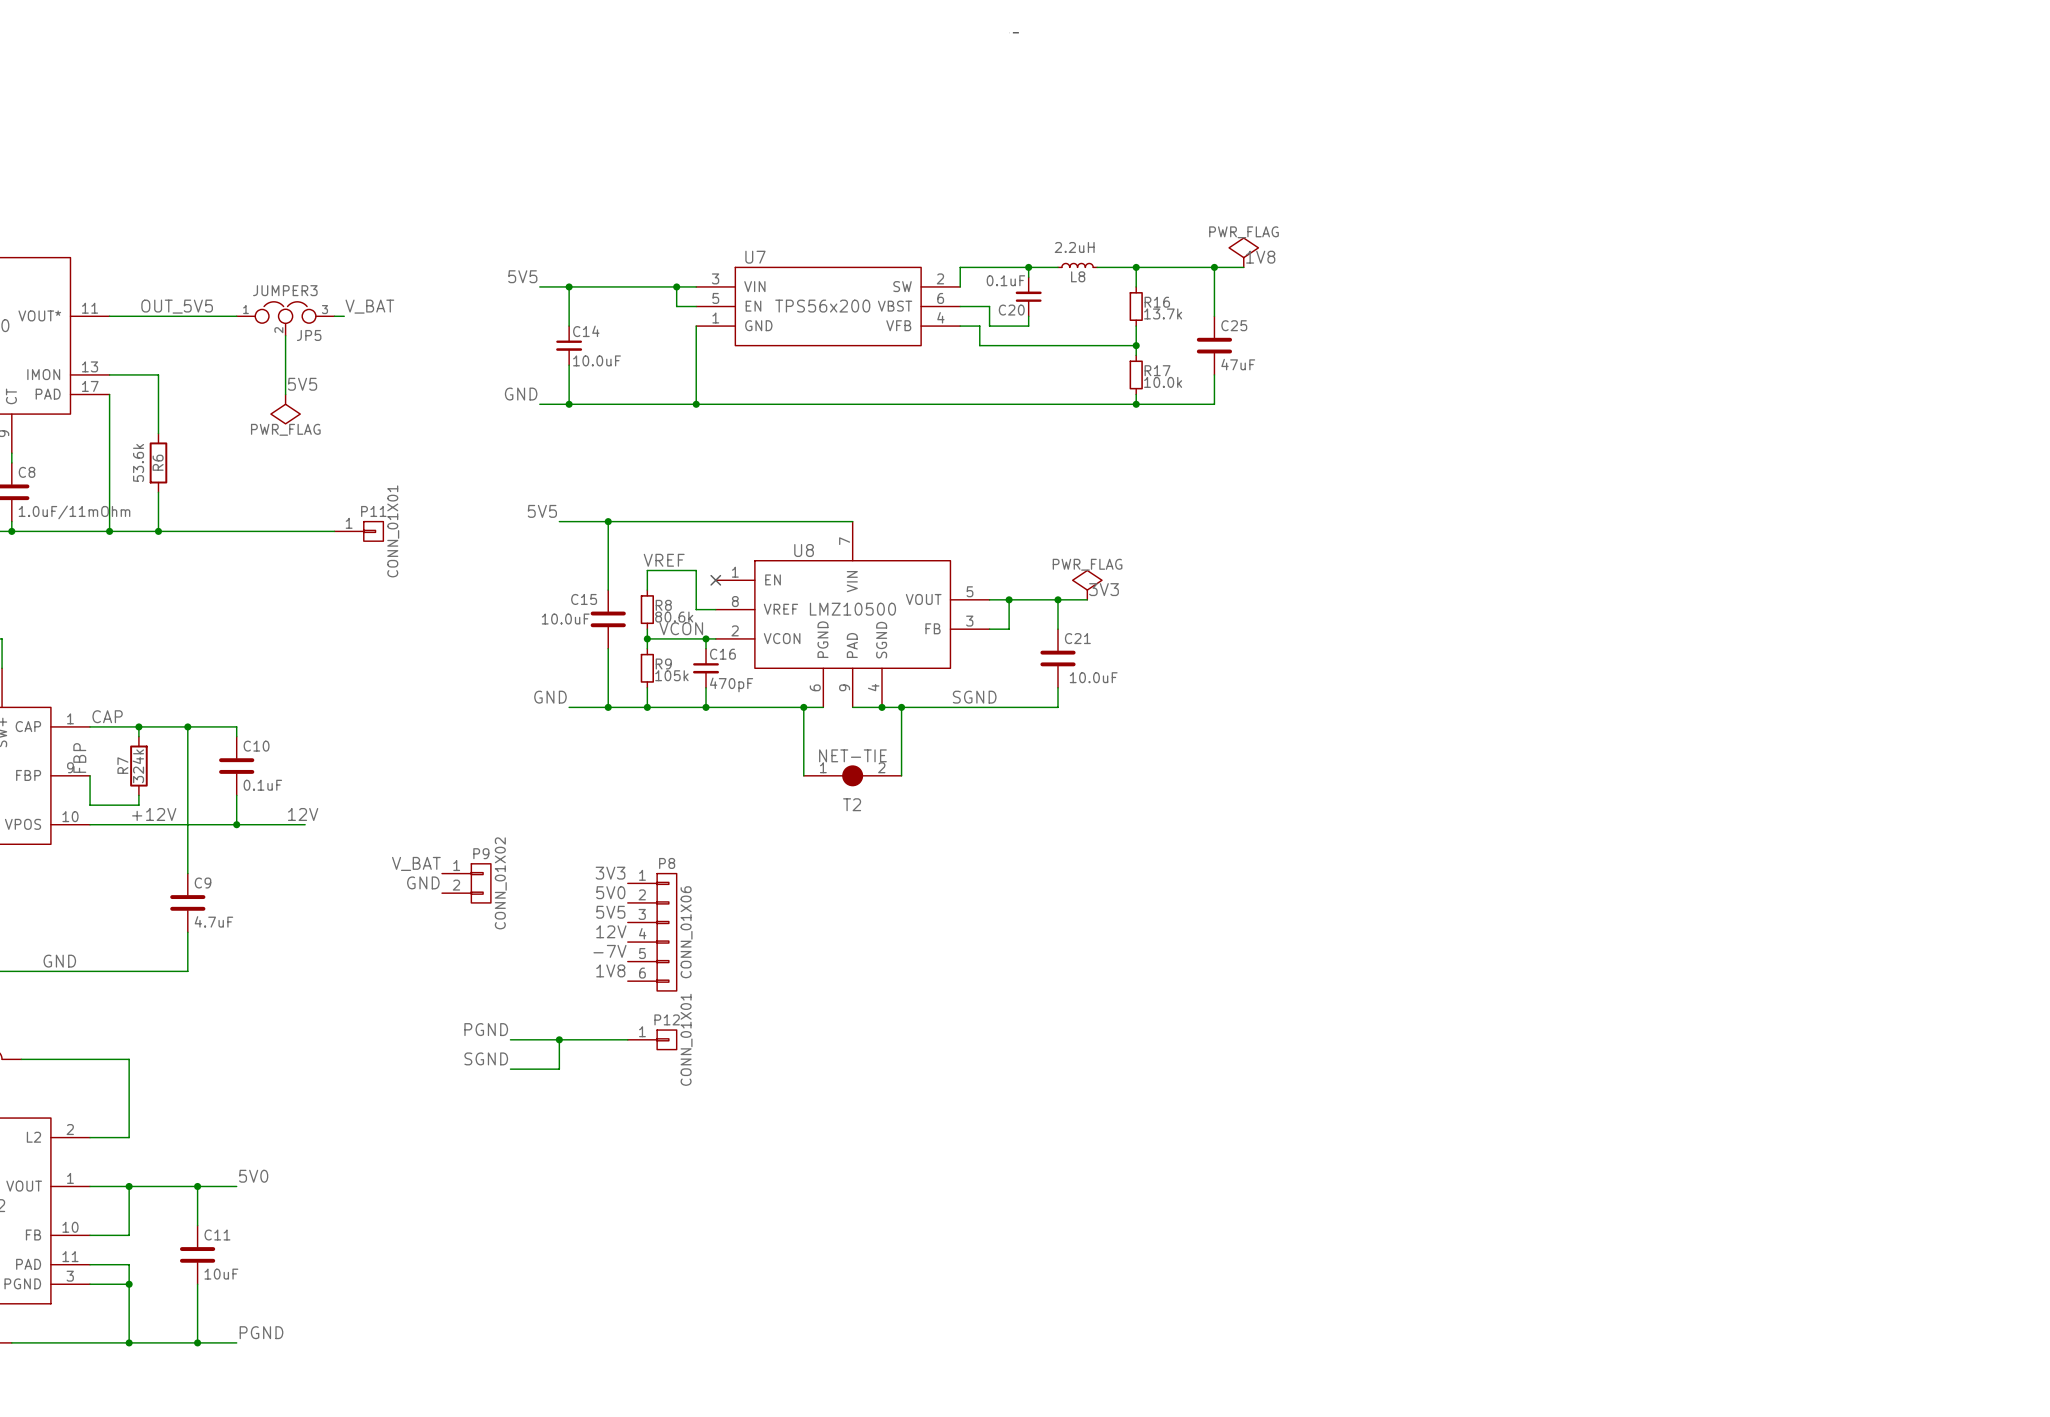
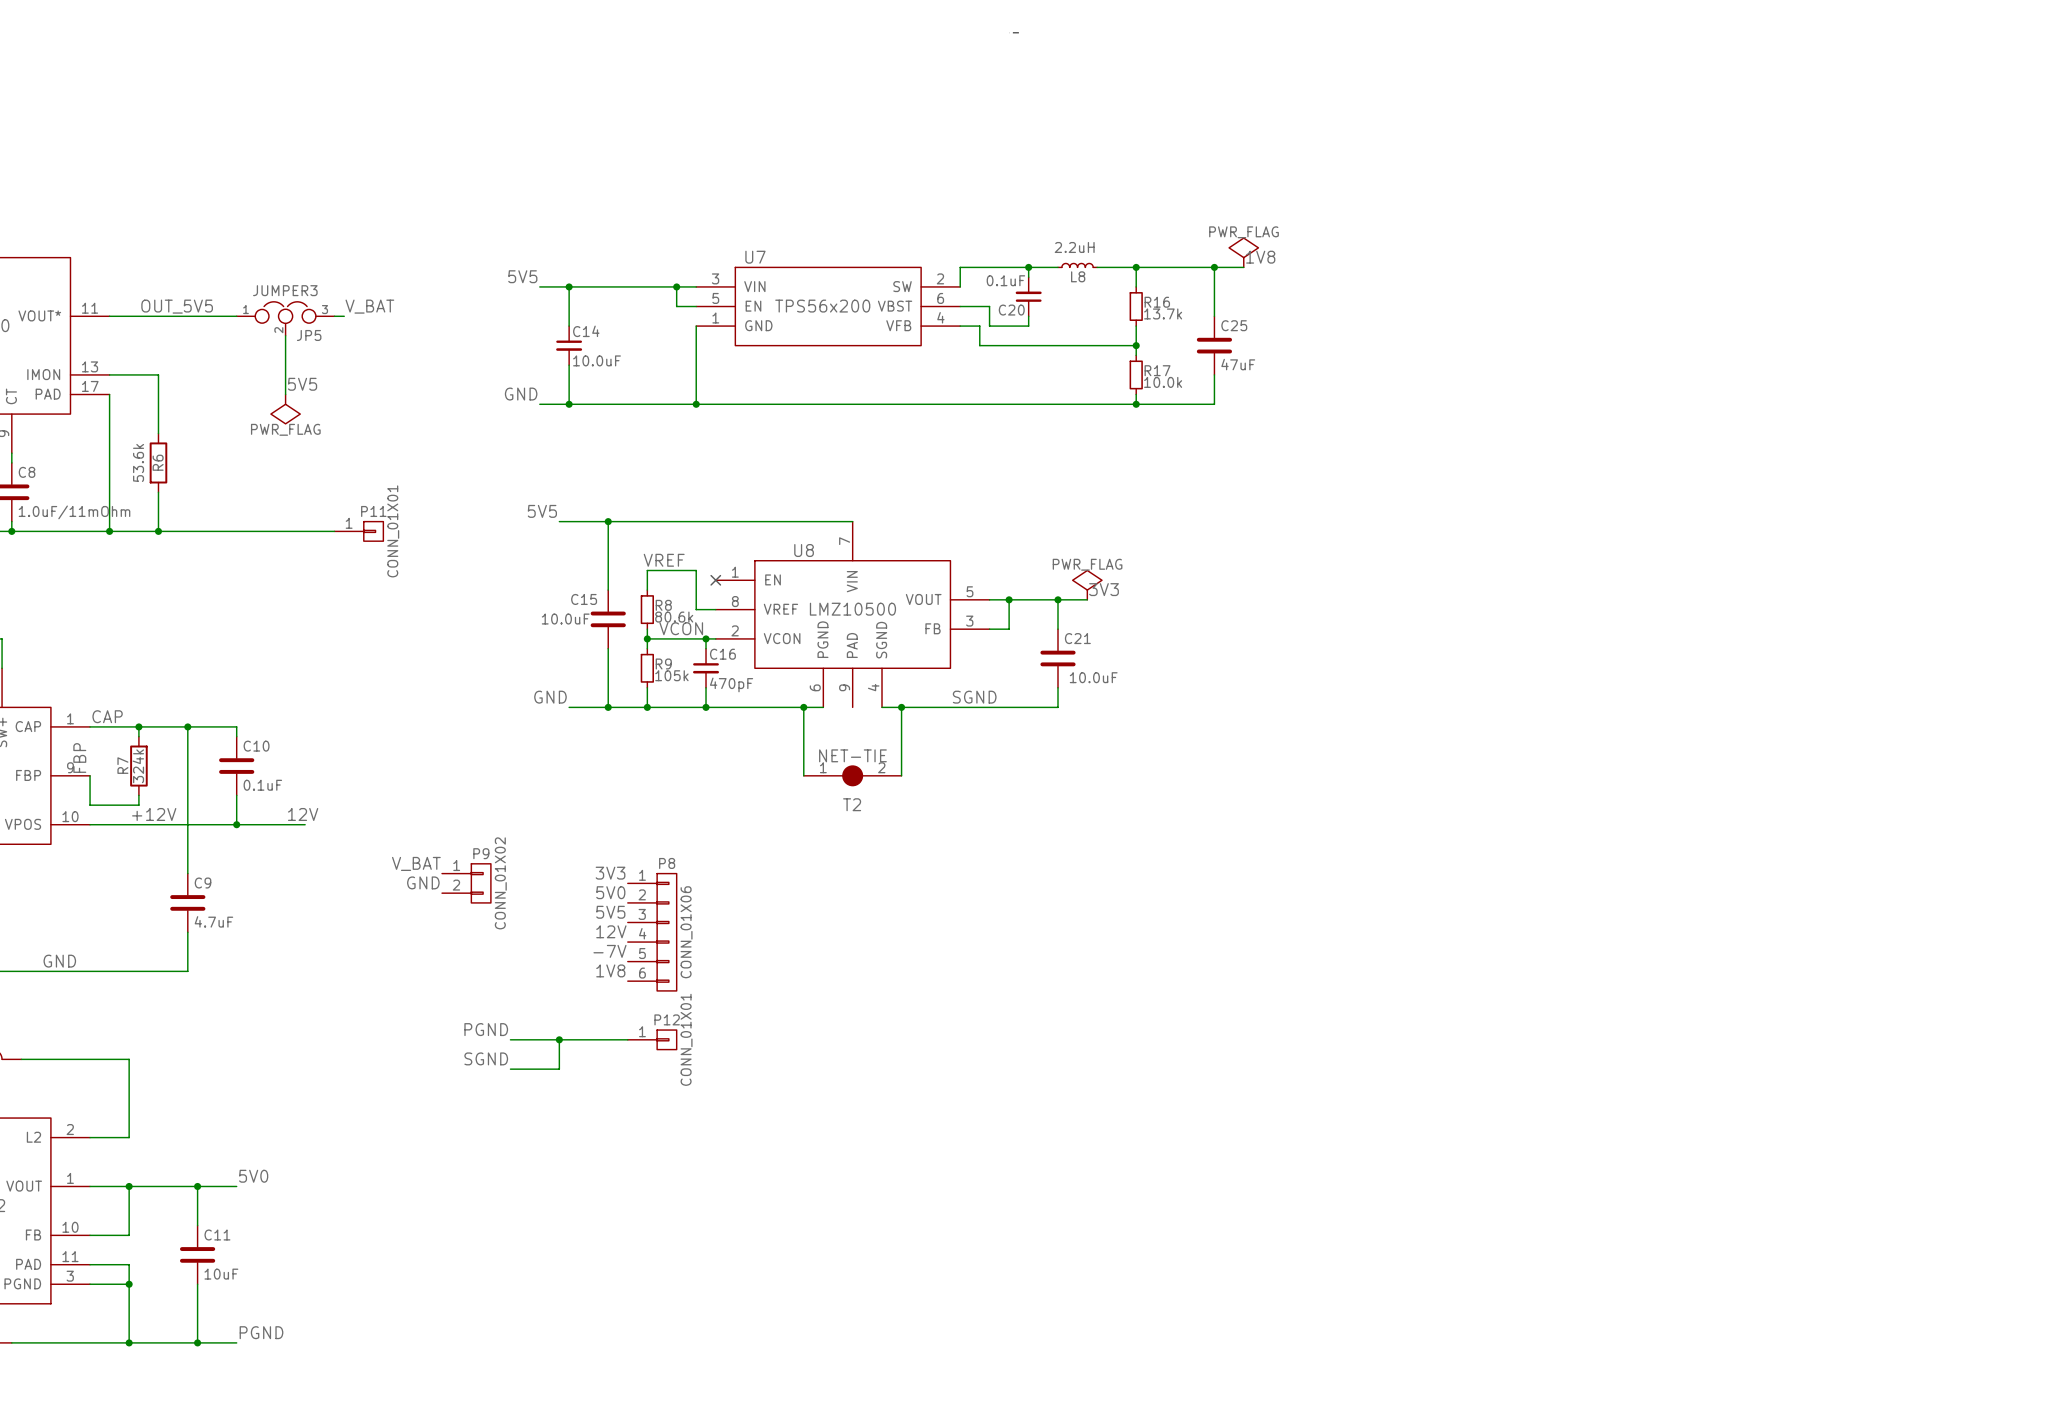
wire: (852, 707) (882, 707) -> none
junction: (882, 707) -> none

